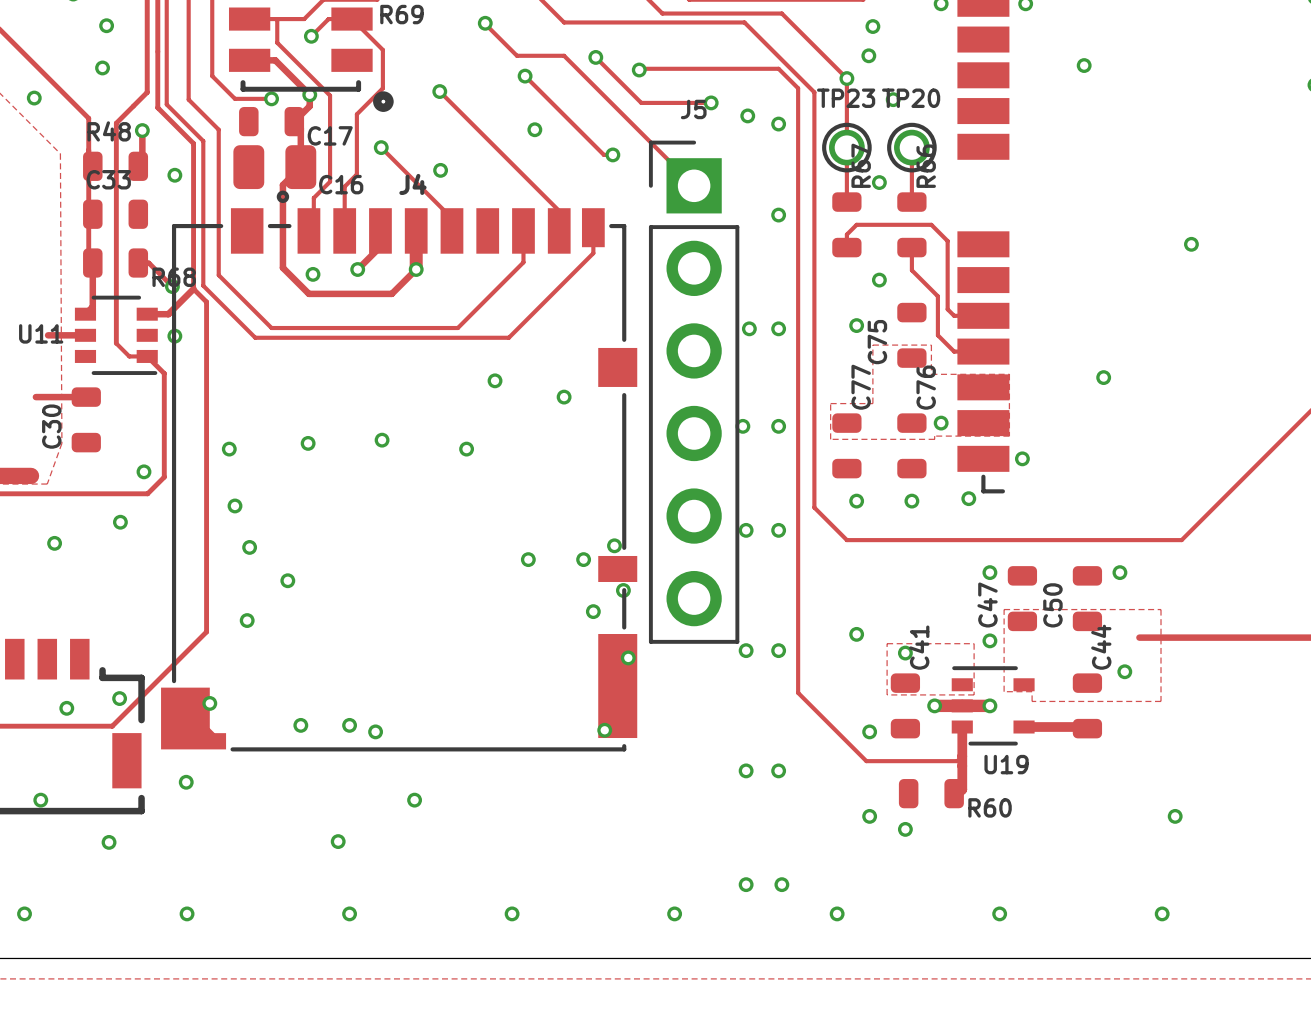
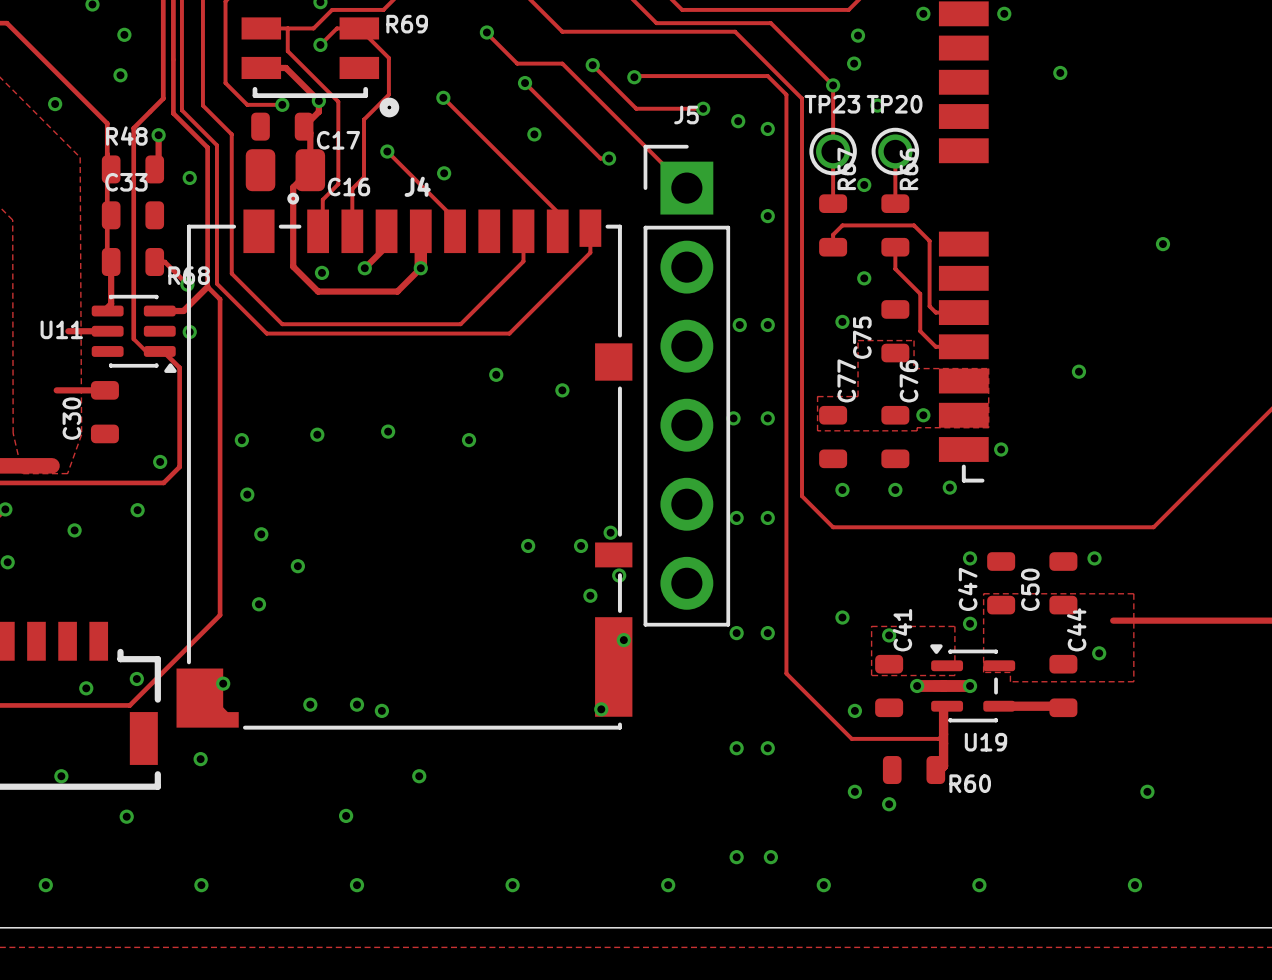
U11 footprint: [74, 295, 158, 375] -> [91, 294, 177, 373]
U19 footprint: [951, 666, 1035, 746] -> [930, 644, 1016, 723]

